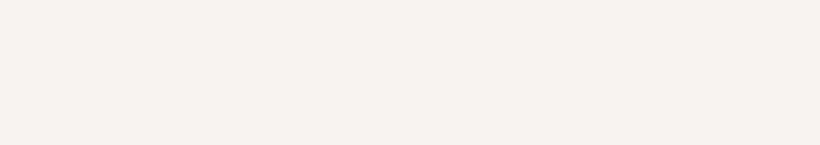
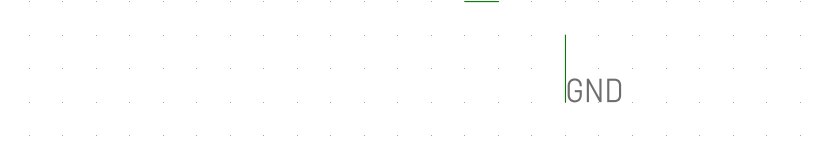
wire: none -> (464, 1) (498, 1)
wire: none -> (565, 35) (565, 102)
label: none -> GND (594, 90)

